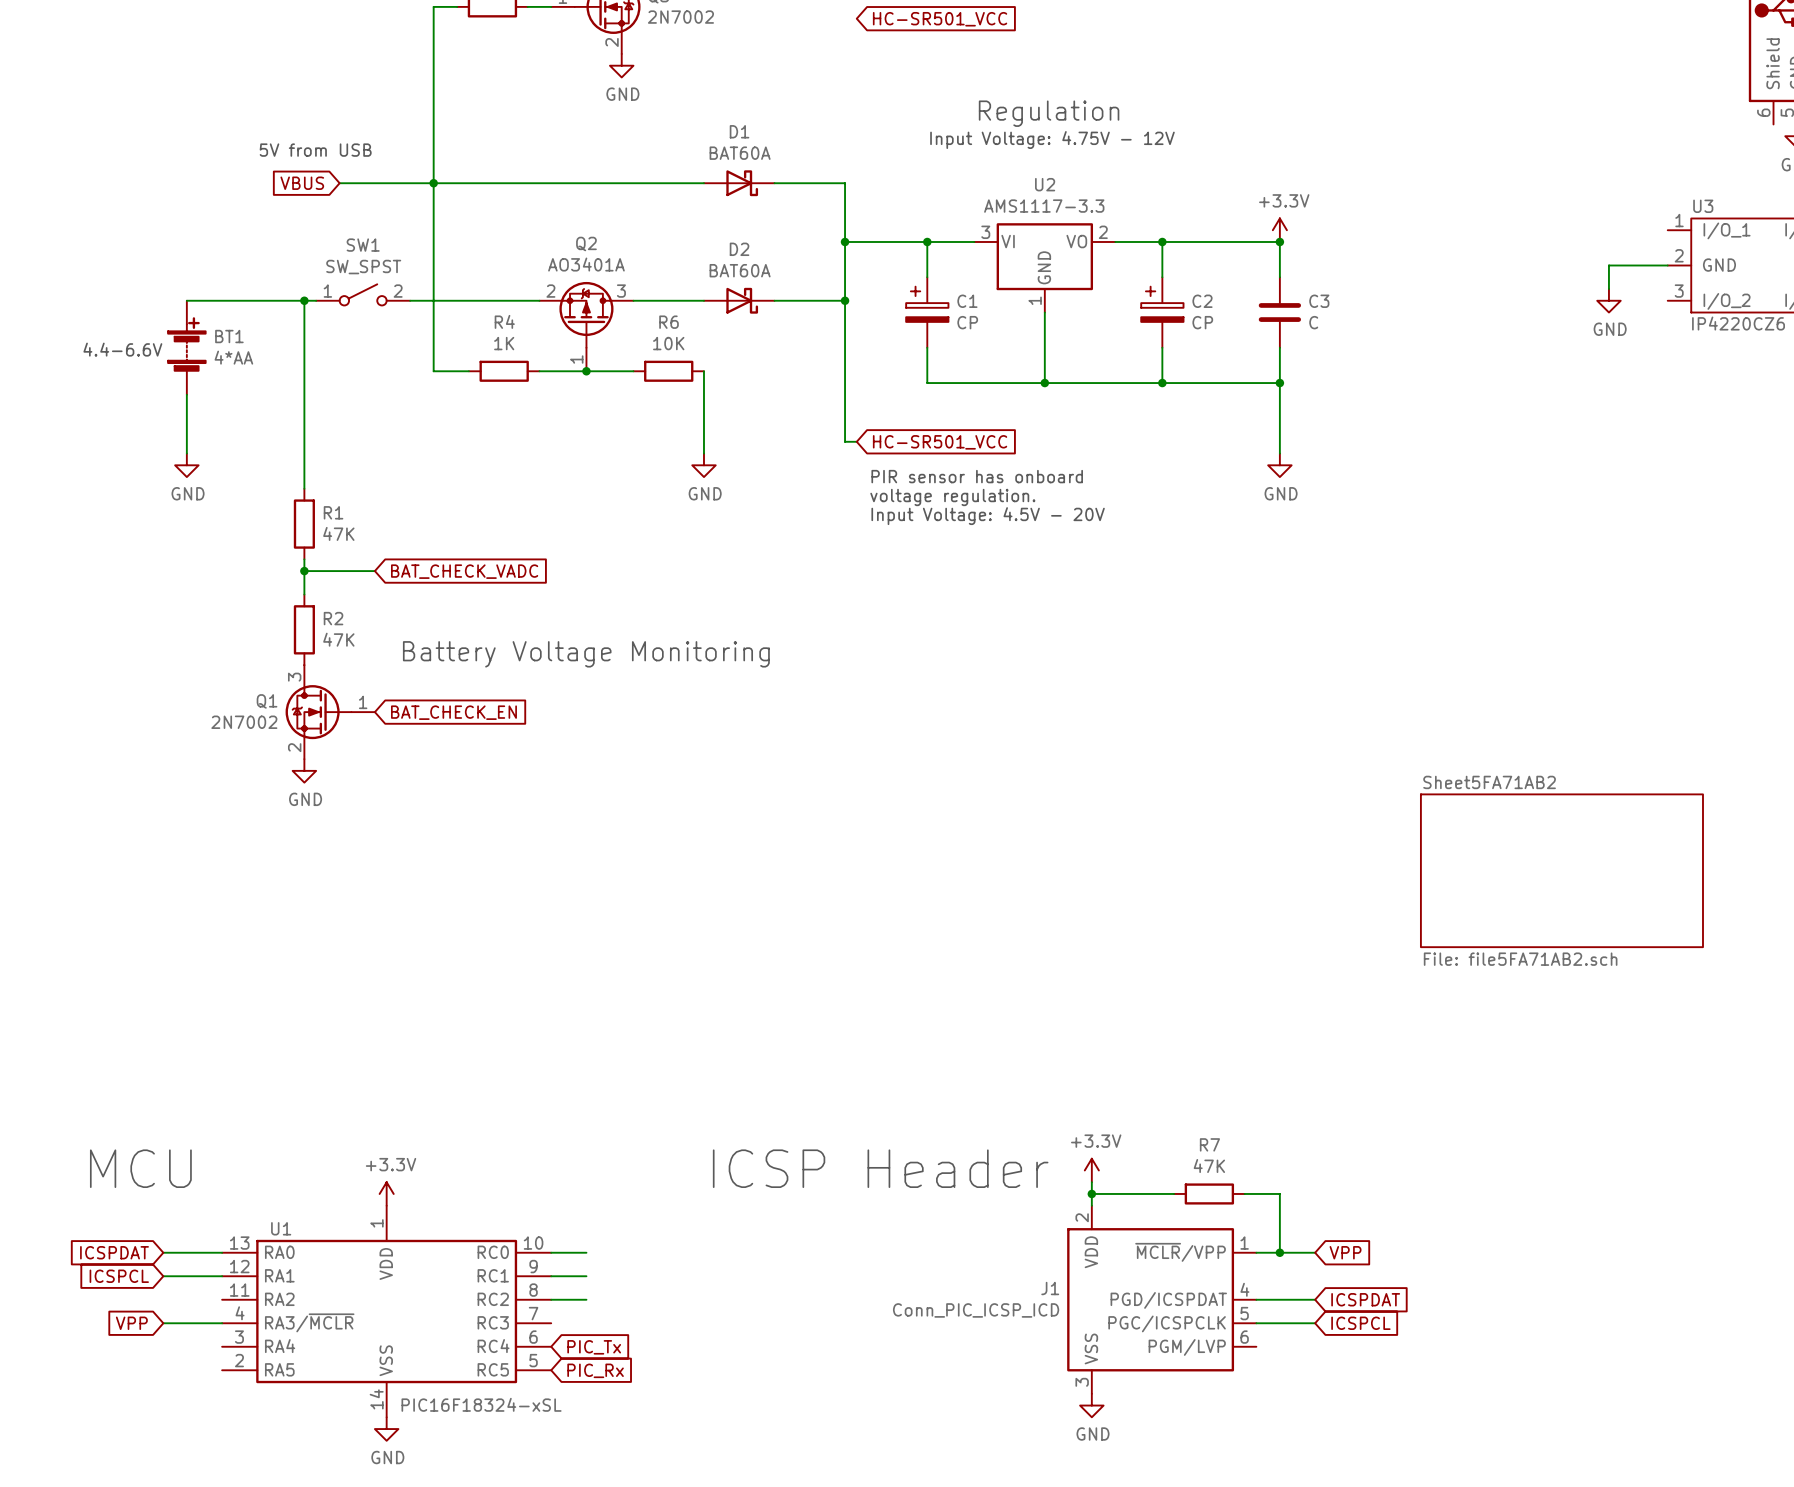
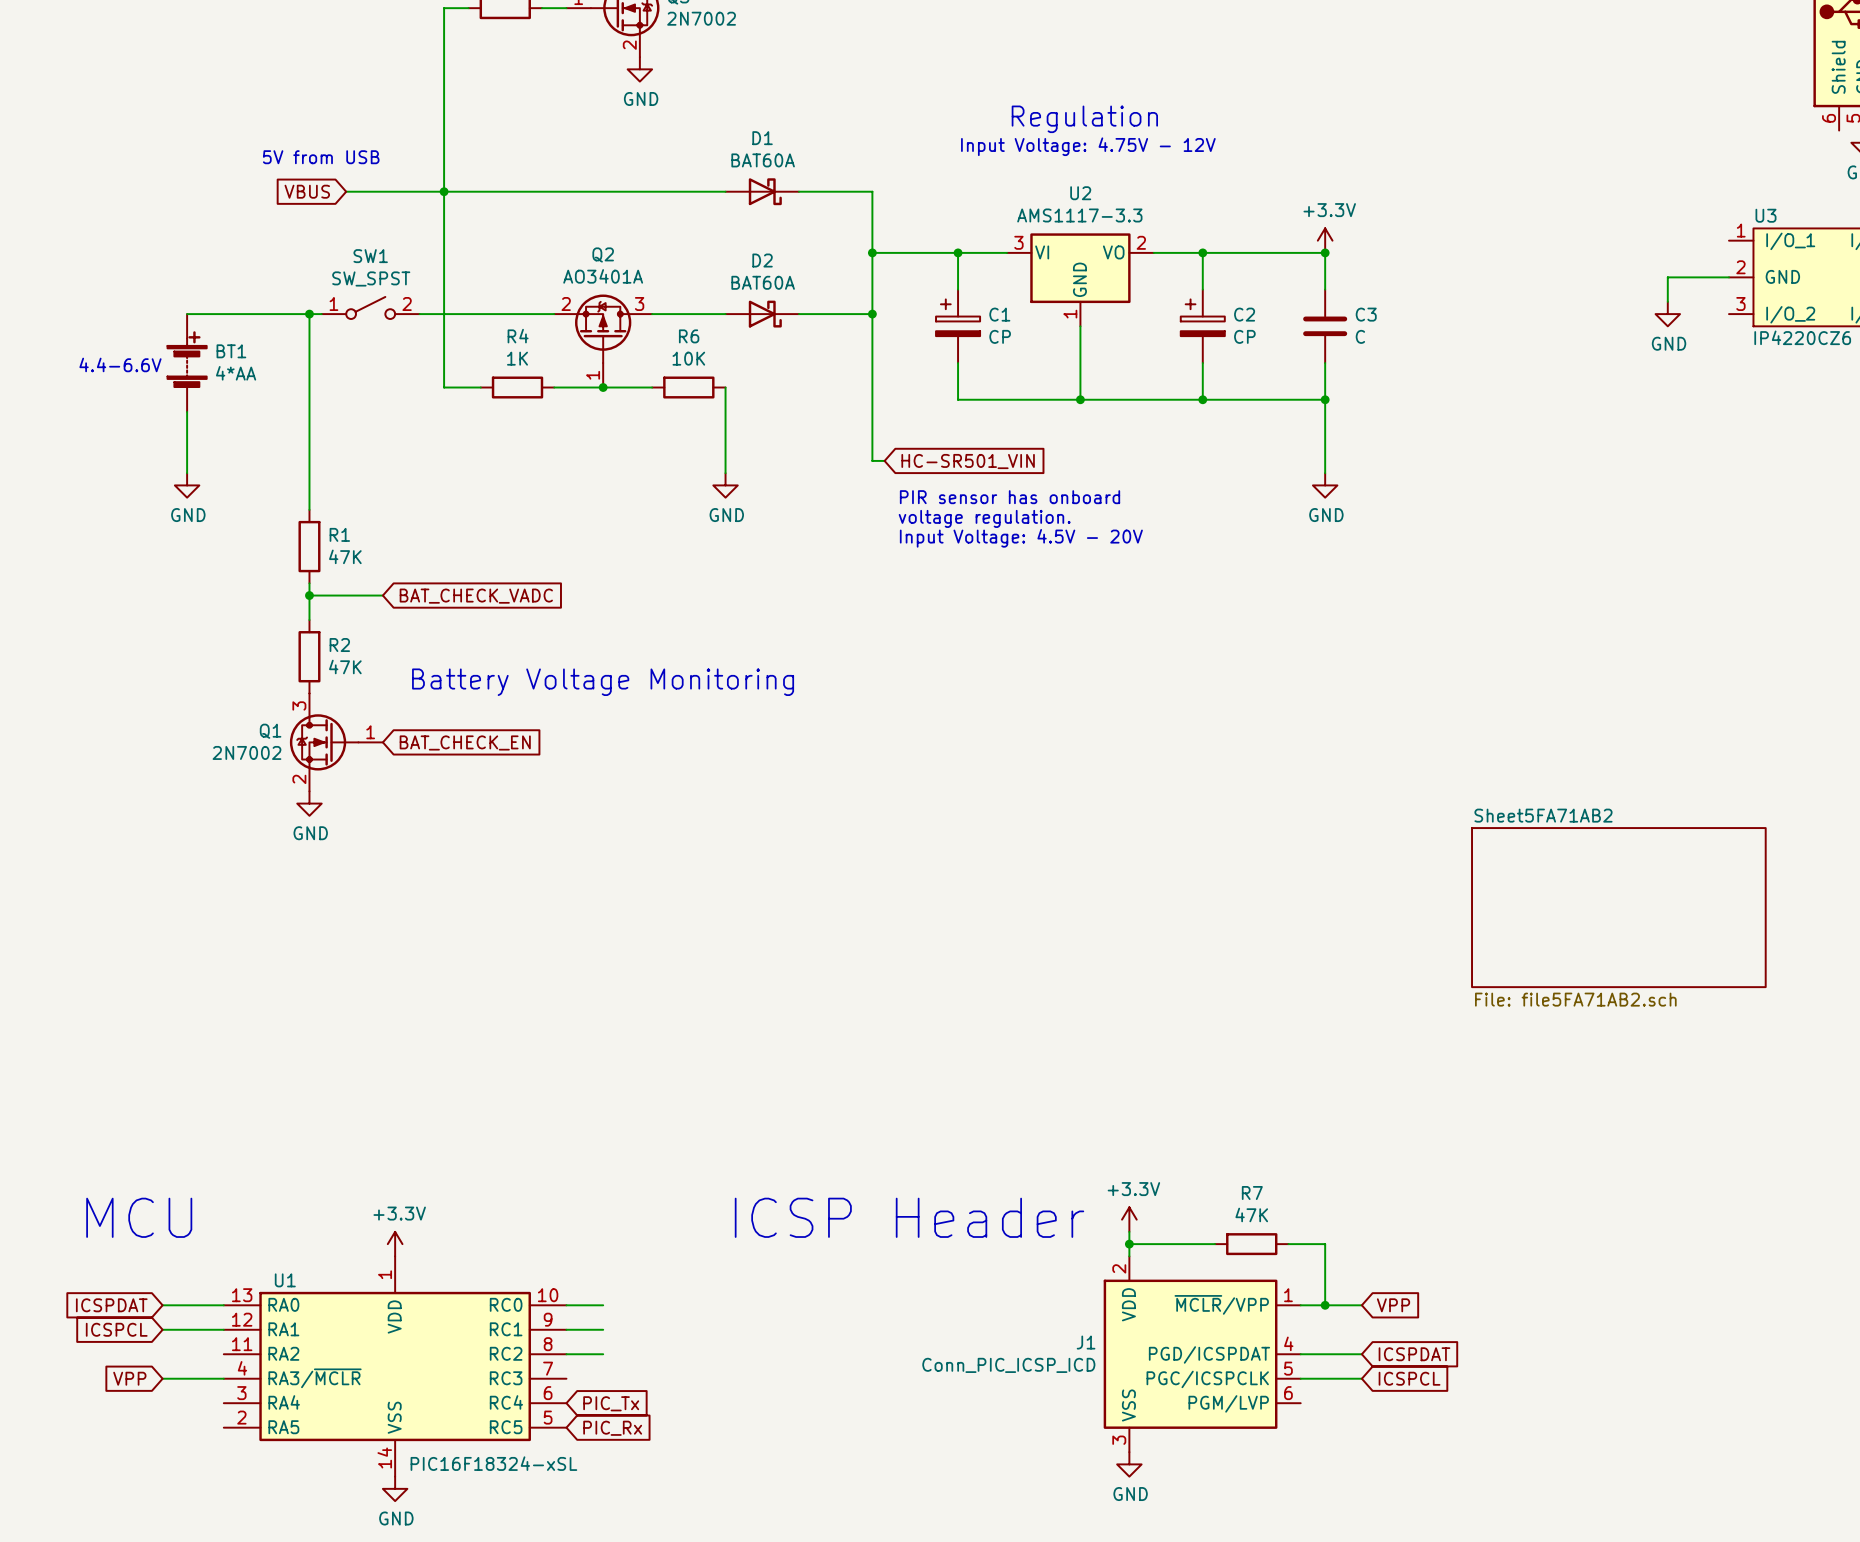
global label: HC-SR501_VCC (940, 19) -> none
global label: HC-SR501_VCC (940, 442) -> HC-SR501_VIN (968, 461)

